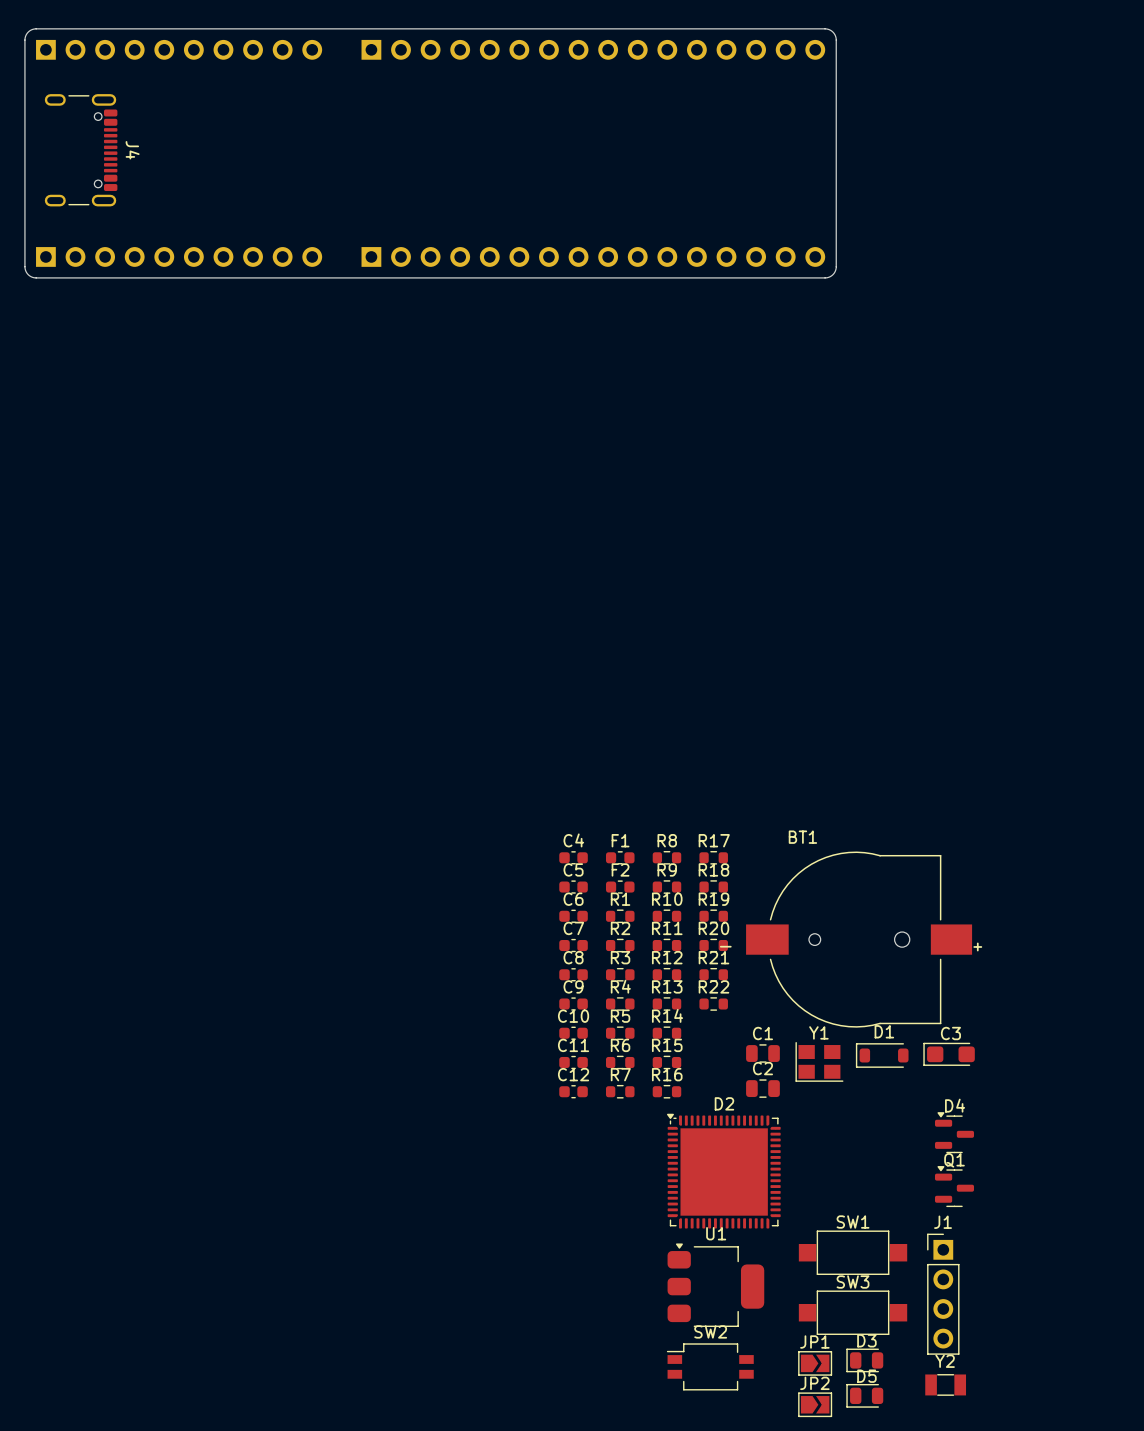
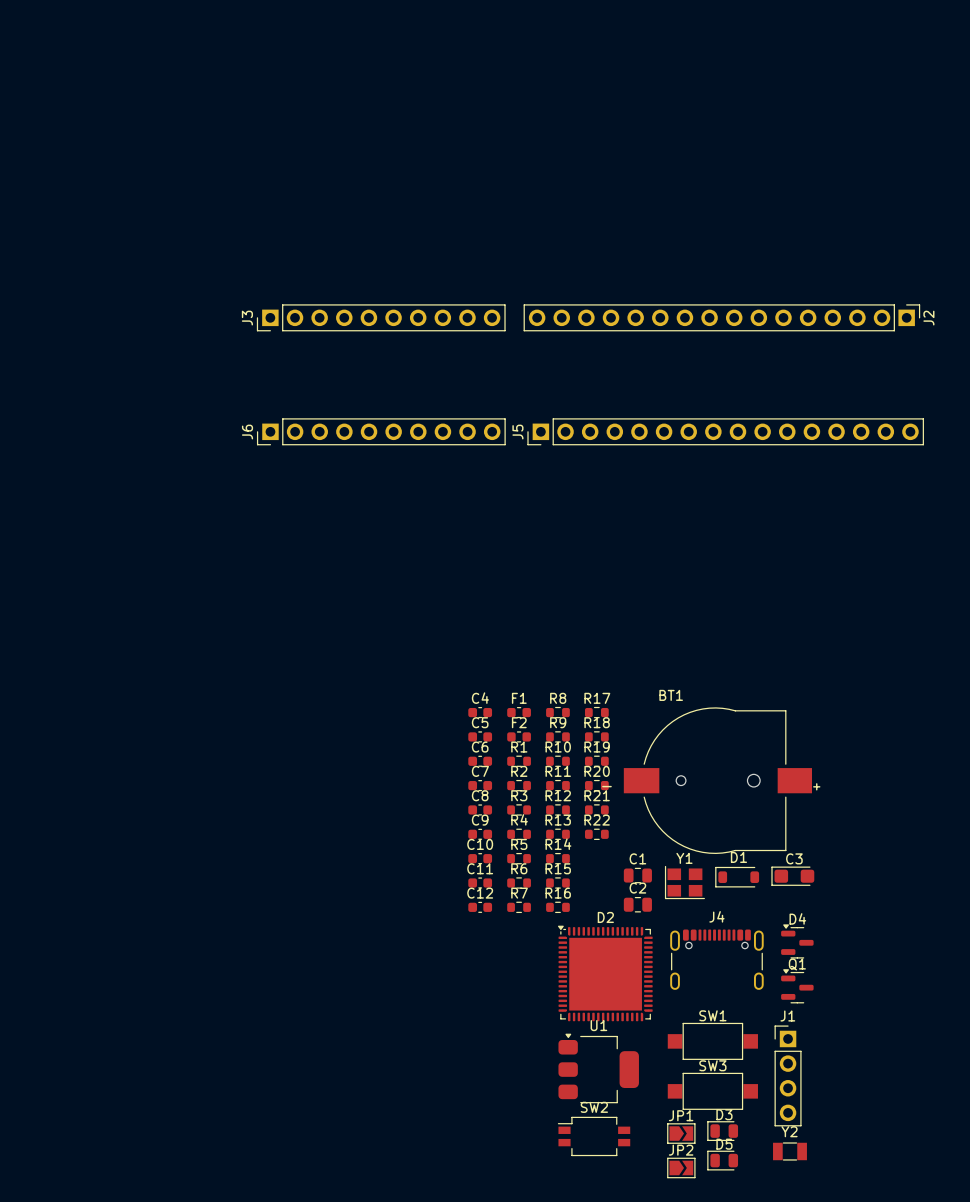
board edge: (36, 28) (828, 29) (834, 34) (836, 40) (835, 270) (831, 276) (825, 277) (32, 277) (26, 272) (24, 266) (24, 40) (28, 32) (36, 28) -> none
part: (179, 49) -> none
part: (593, 49) -> none
J4 rotation: 0° (81, 150) -> 90° counterclockwise (716, 959)
J4 position: (81, 150) -> (716, 959)
part: (179, 256) -> none
part: (593, 256) -> none
J3: none -> (381, 317)
J2: none -> (721, 317)
J6: none -> (381, 431)
J5: none -> (725, 431)

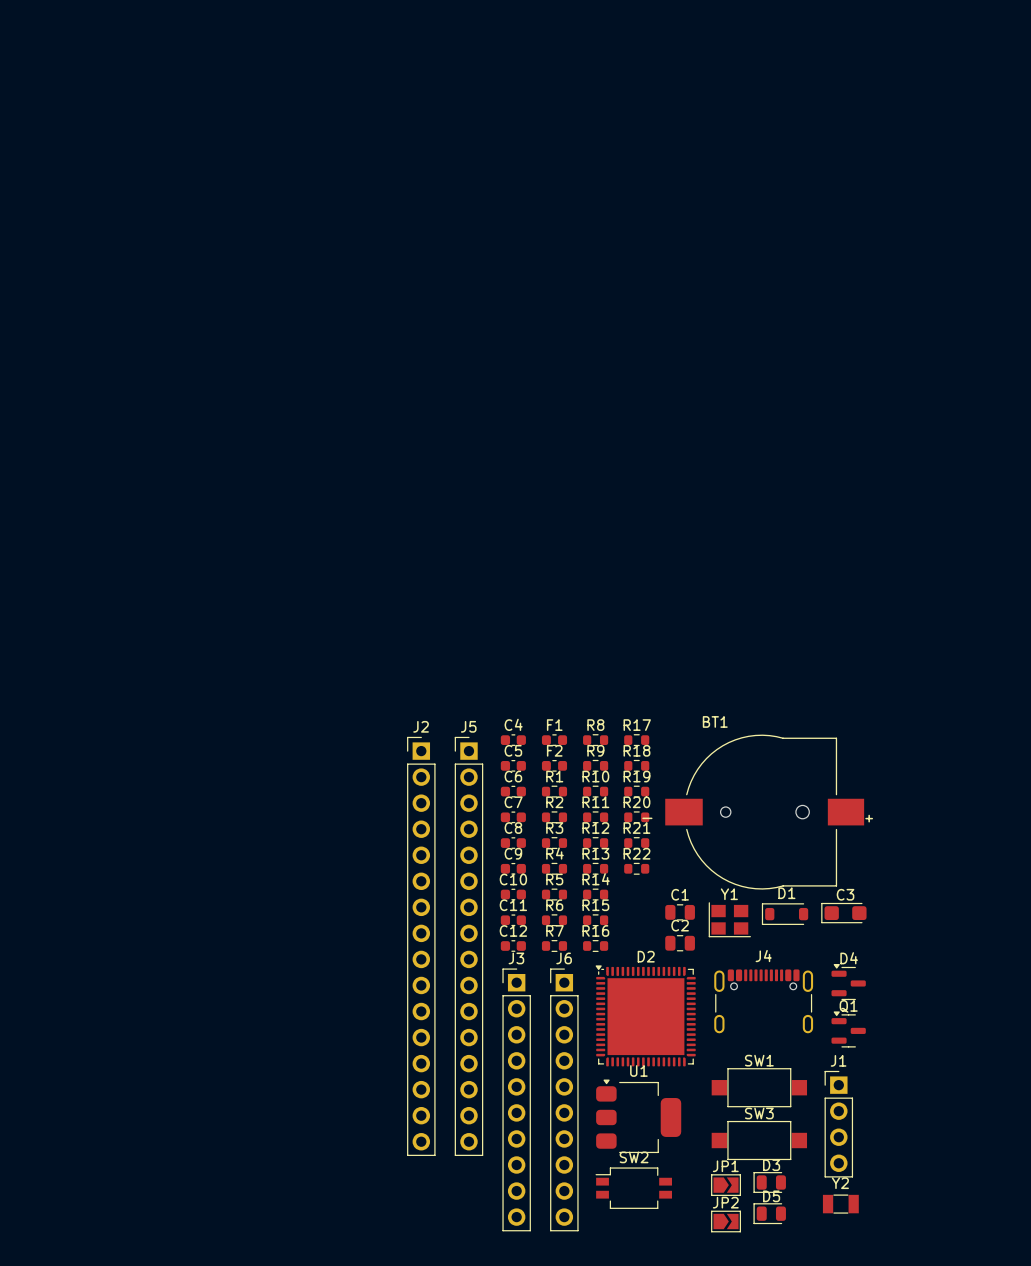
J3 rotation: 0° (381, 317) -> 90° clockwise (516, 1099)
J3 position: (381, 317) -> (516, 1099)
J2 rotation: 0° (721, 317) -> 90° counterclockwise (421, 946)
J2 position: (721, 317) -> (421, 946)
J6 rotation: 0° (381, 431) -> 90° clockwise (564, 1099)
J6 position: (381, 431) -> (564, 1099)
J5 rotation: 0° (725, 431) -> 90° clockwise (468, 946)
J5 position: (725, 431) -> (468, 946)

